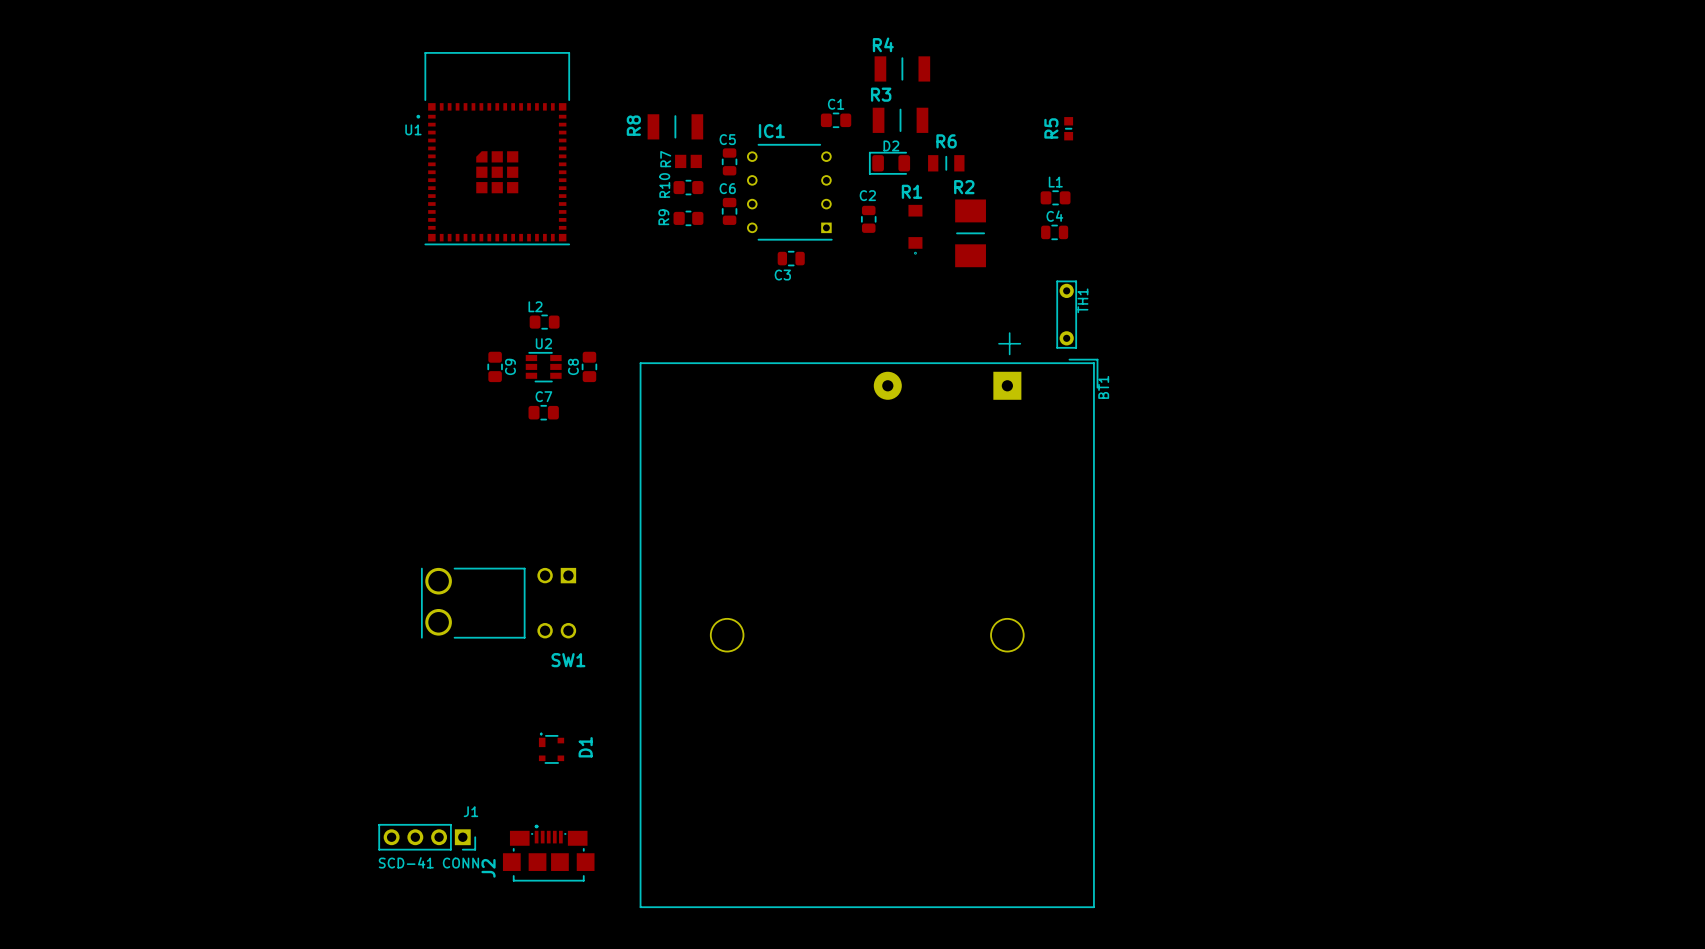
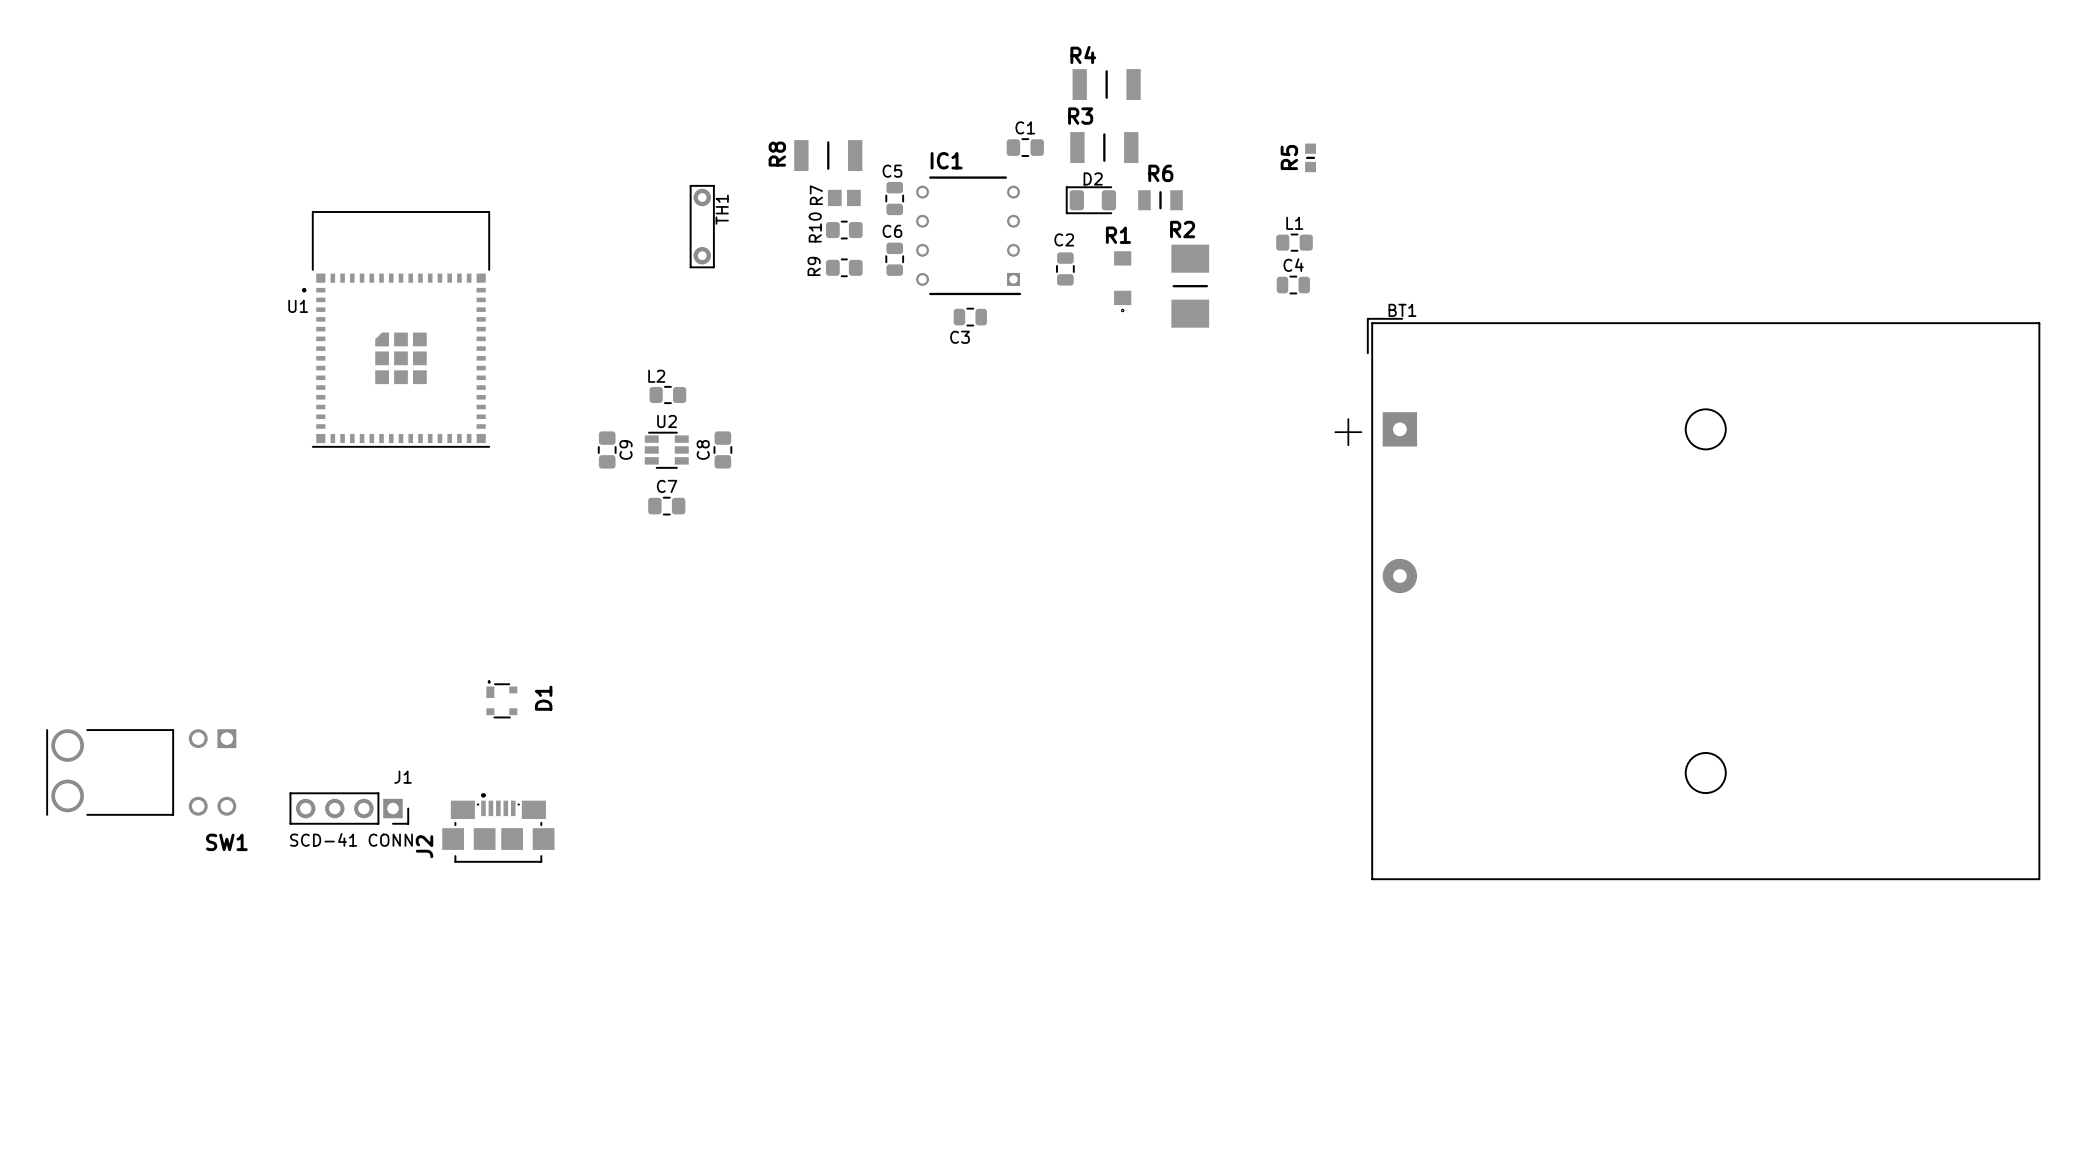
U1 position: (493, 148) -> (395, 329)
TH1 position: (1066, 314) -> (702, 226)
SW1 position: (498, 603) -> (141, 772)
BT1 rotation: 0° (869, 633) -> 90° counterclockwise (1703, 599)
BT1 position: (869, 633) -> (1703, 599)
D1 position: (551, 748) -> (501, 699)
J1 position: (427, 837) -> (349, 808)
J2 position: (548, 852) -> (498, 827)
text position: SCD-41 CONN (428, 862) -> SCD-41 CONN (351, 839)

